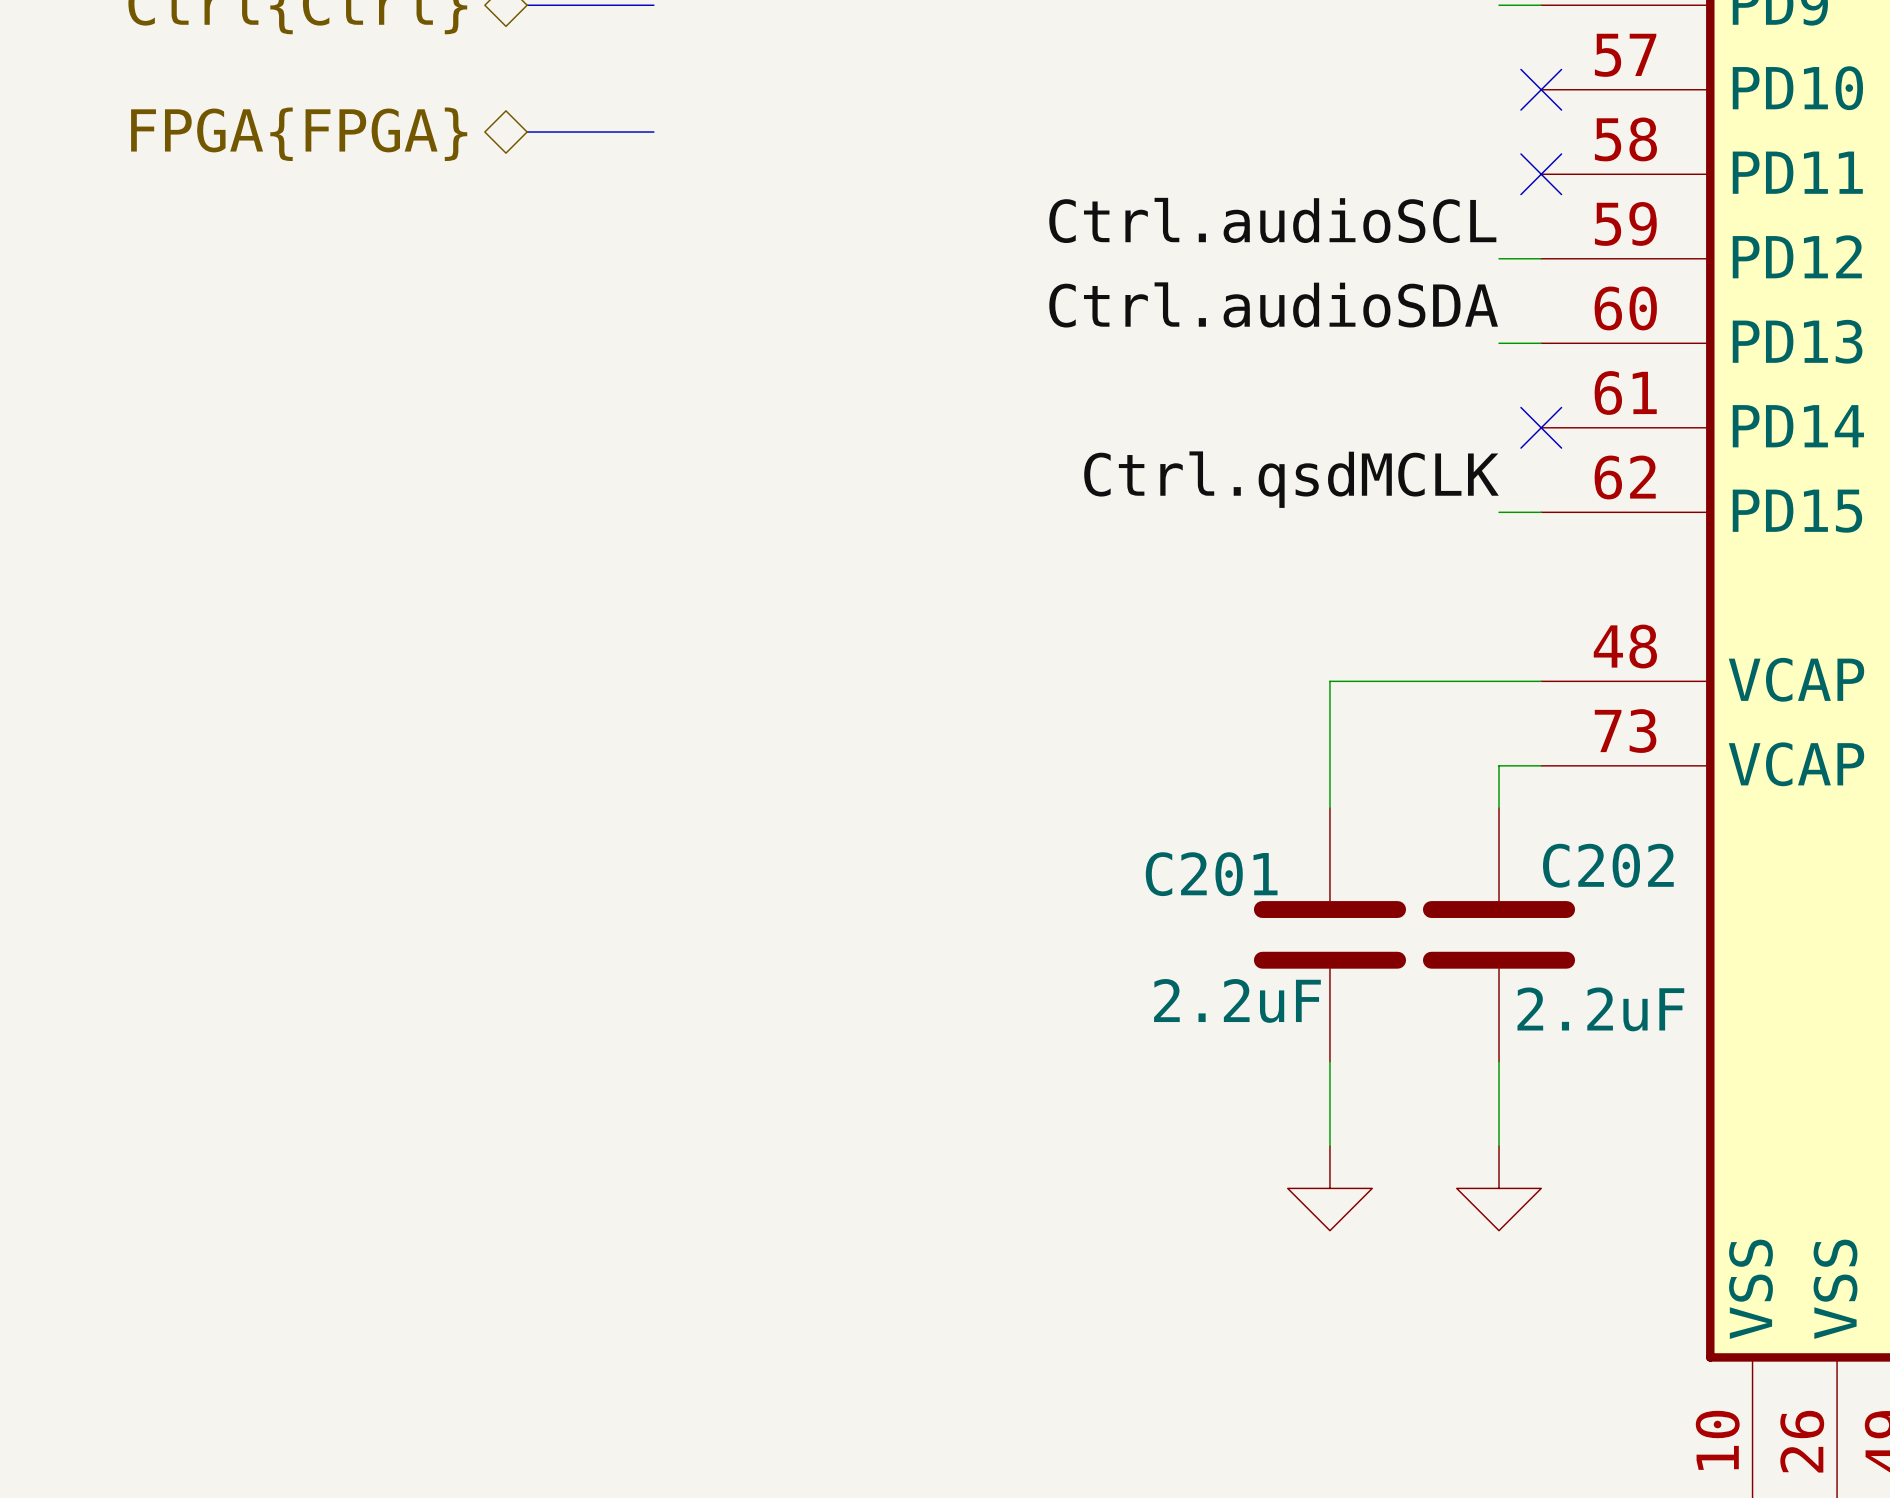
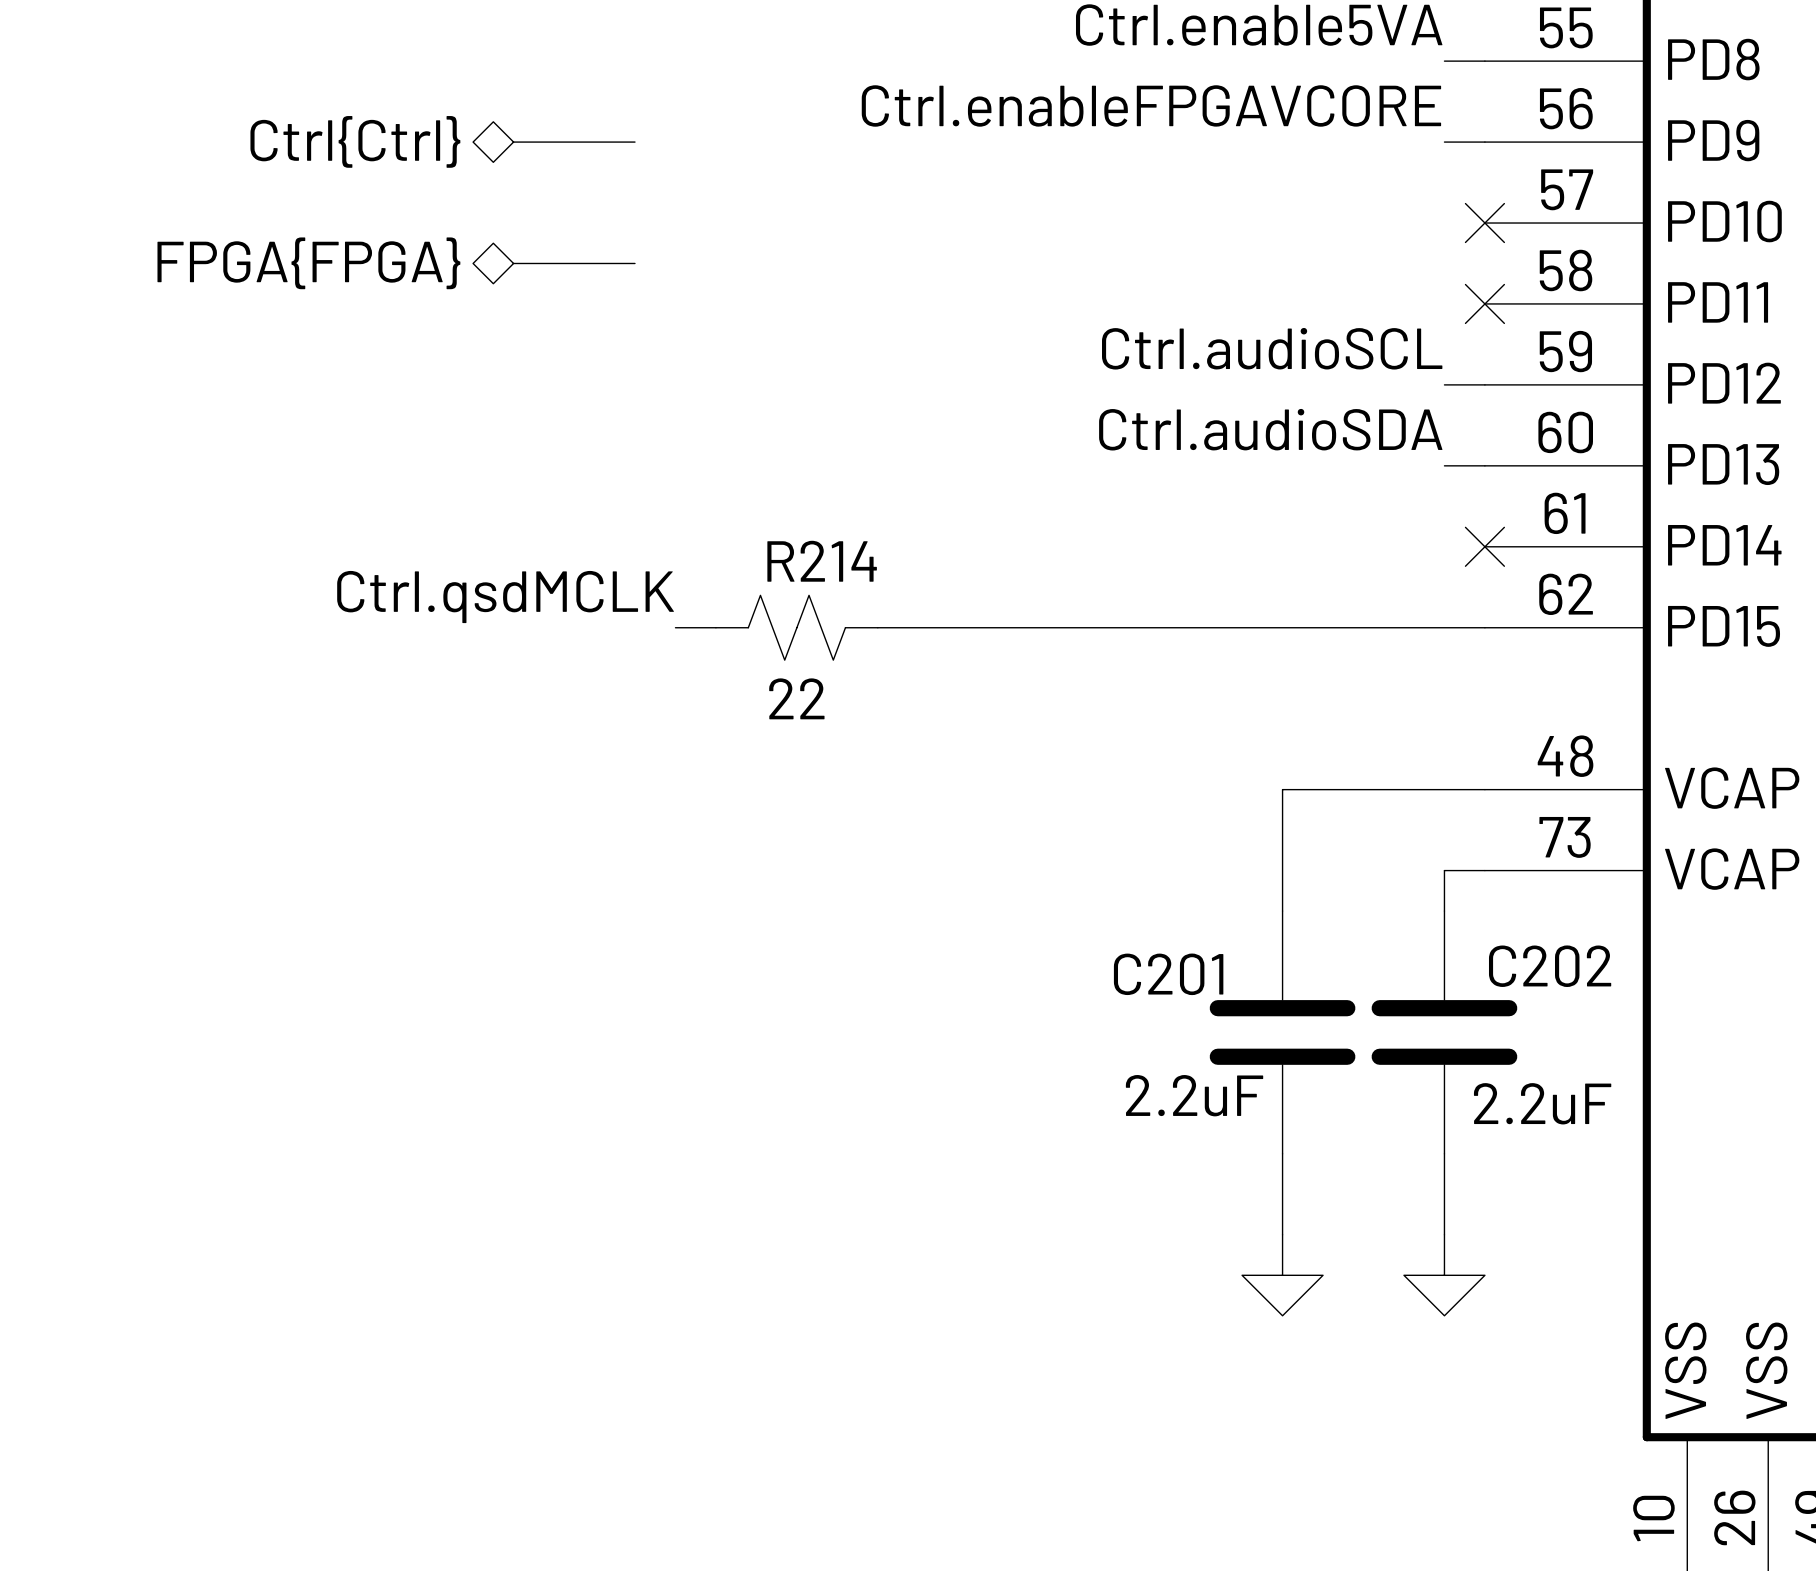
label position: Ctrl.qsdMCLK (1291, 479) -> Ctrl.qsdMCLK (505, 597)
wire: none -> (675, 627) (715, 627)
R214: none -> 22 (796, 627)
wire: none -> (877, 627) (1444, 627)

